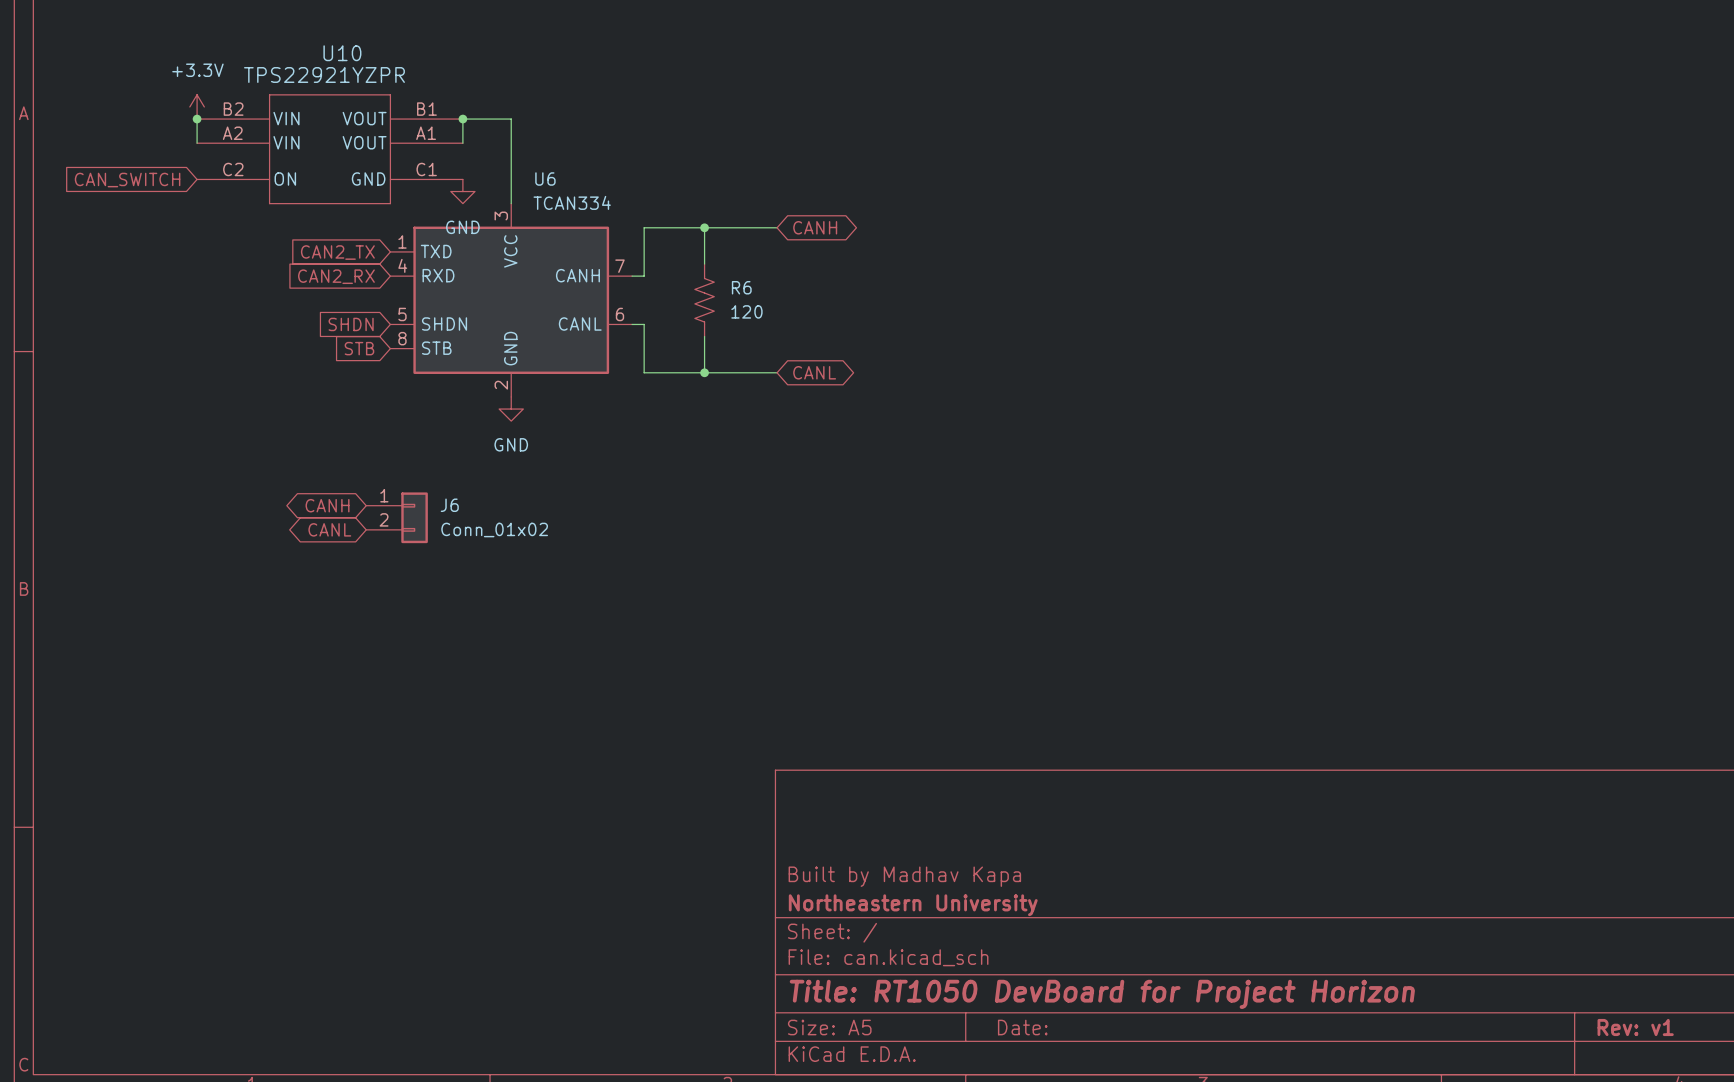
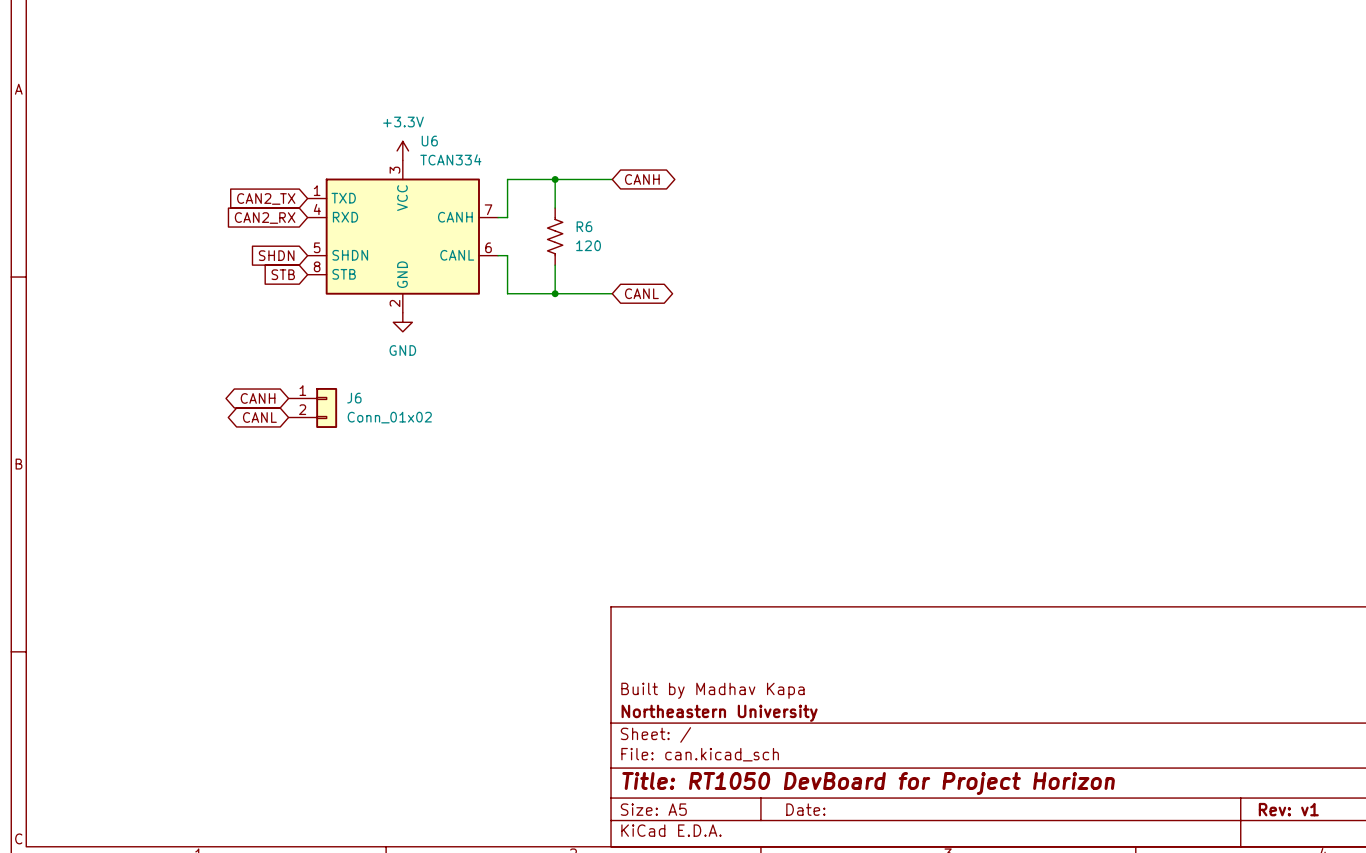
power symbol: +3.3V (197, 106) -> none
wire: (197, 119) (197, 143) -> none
junction: (197, 119) -> none
junction: (462, 119) -> none
wire: (462, 143) (462, 119) (511, 119) (511, 203) -> none
U10: TPS22921YZPR (329, 149) -> none
global label: CAN_SWITCH (127, 180) -> none
power symbol: GND (462, 191) -> none
power symbol: none -> +3.3V (402, 150)

